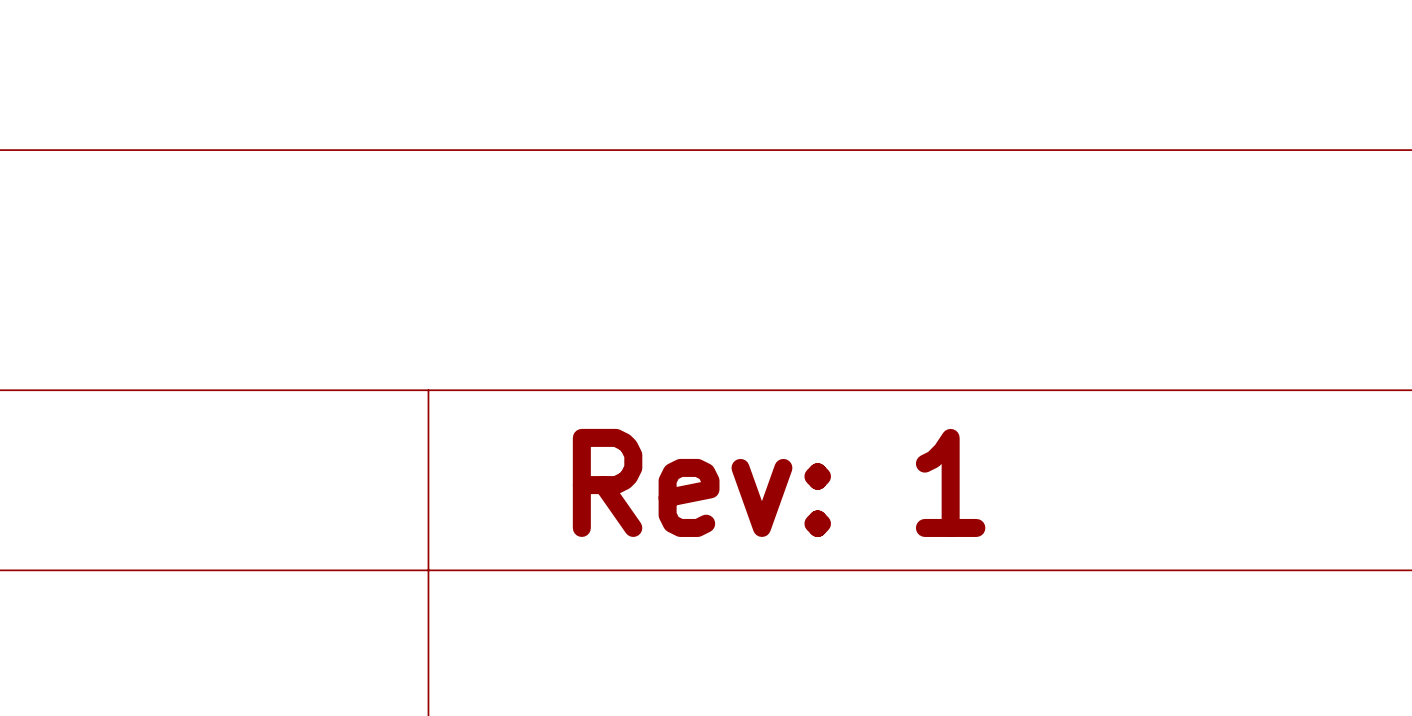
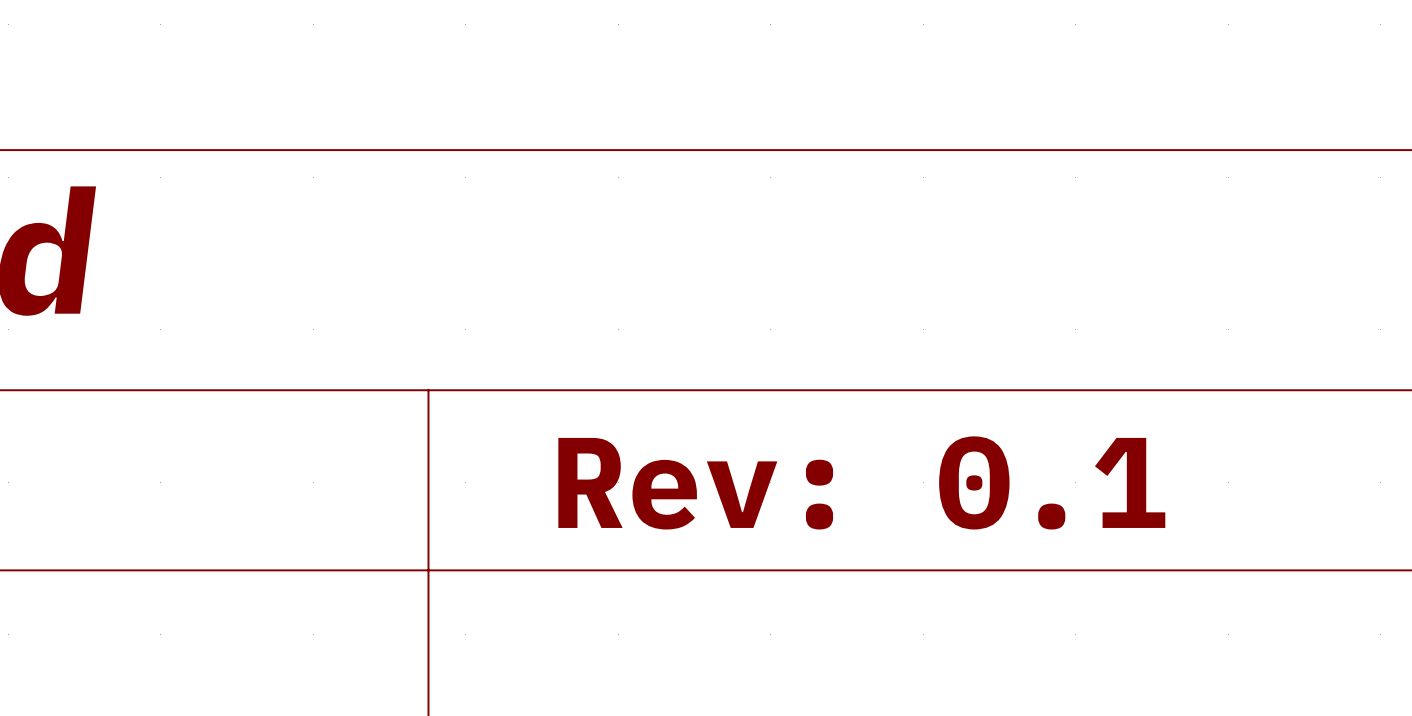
title block: Rev: 1 (779, 482) -> Rev: 0.1 (861, 482)

